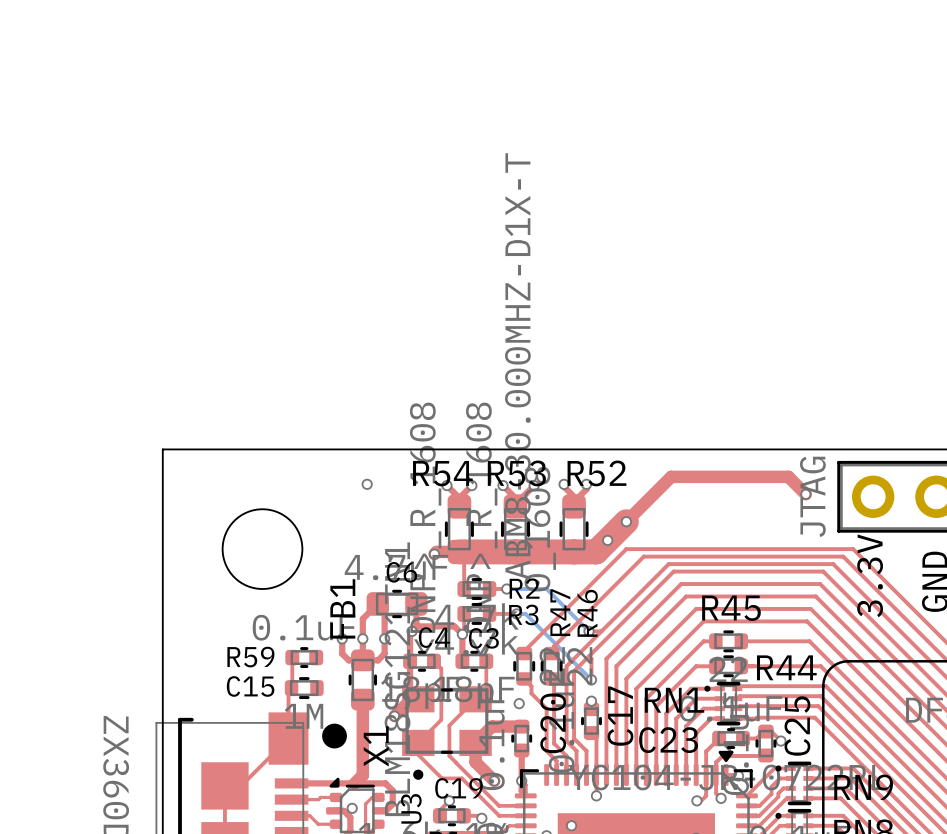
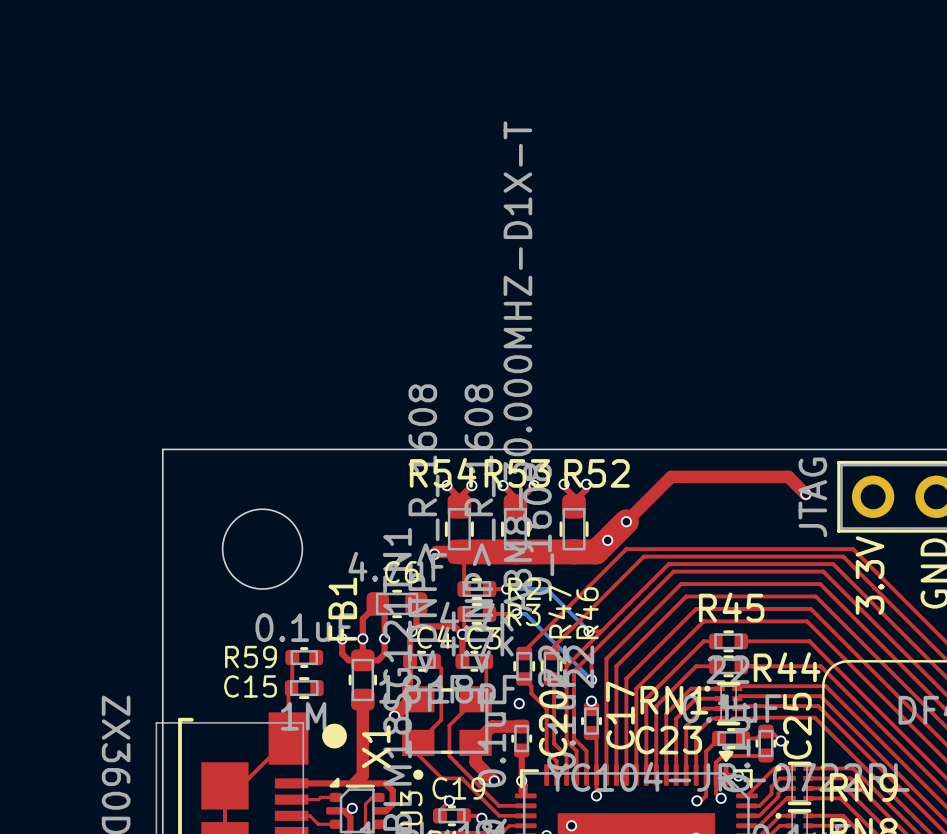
via: (367, 484) -> none

